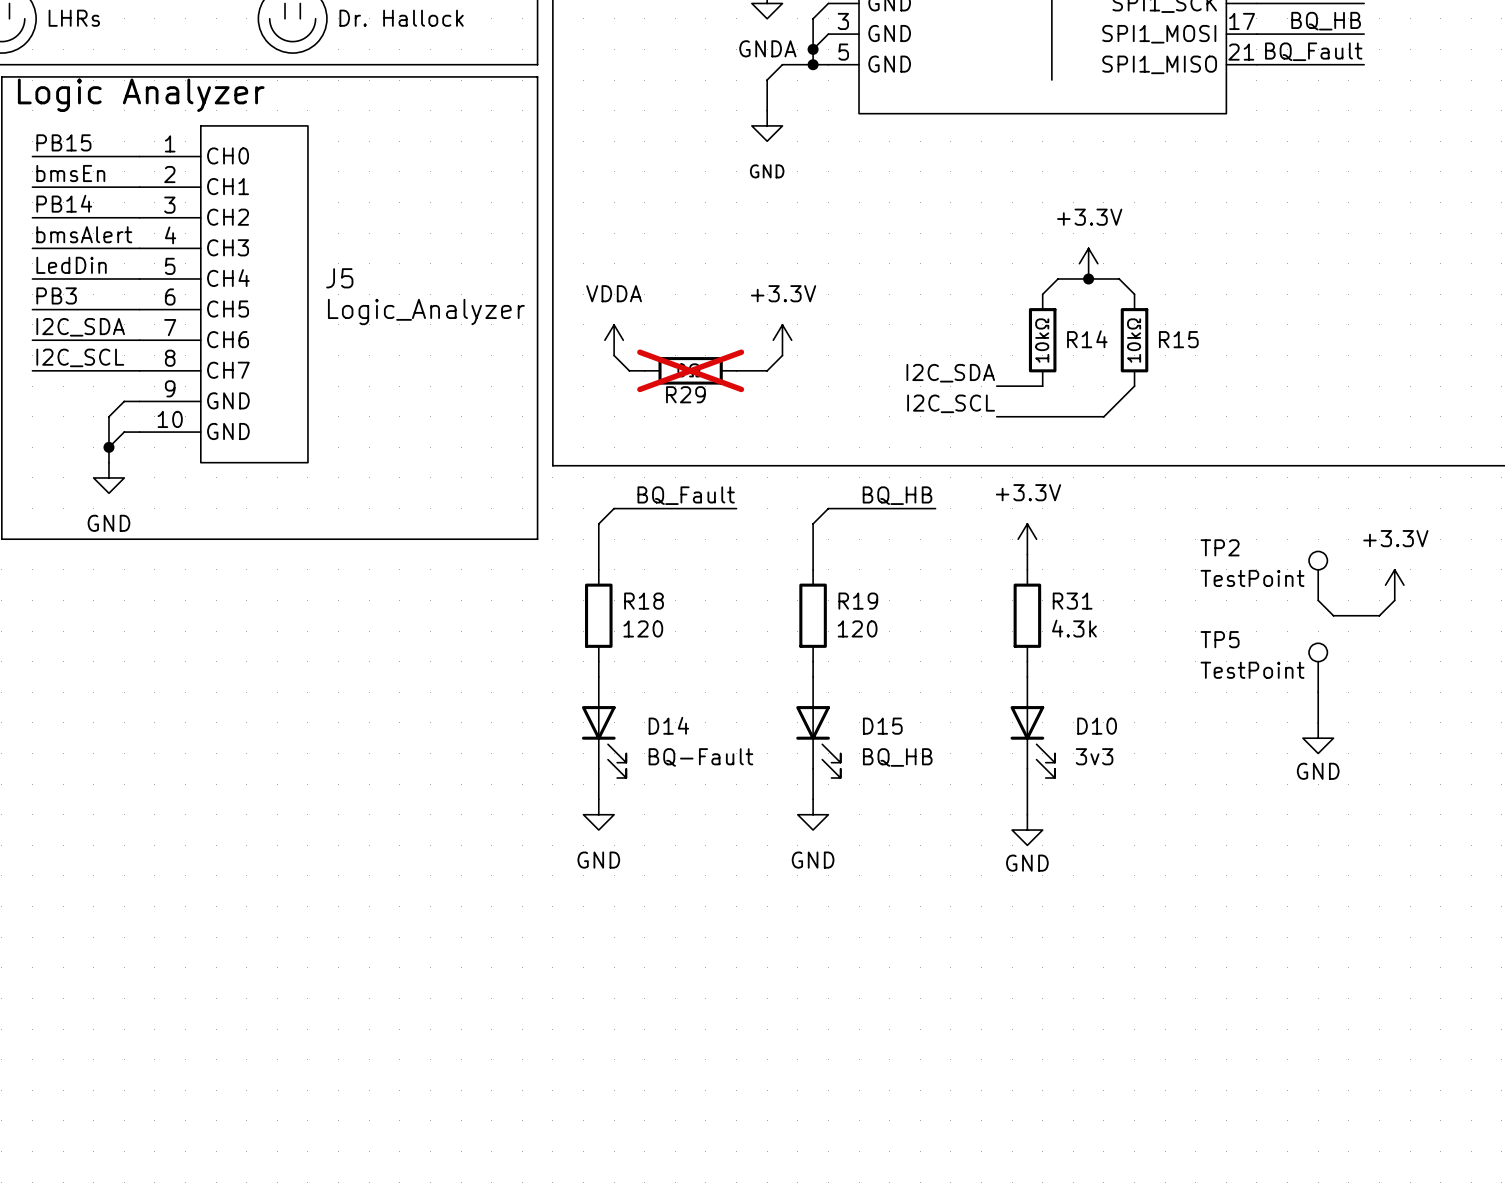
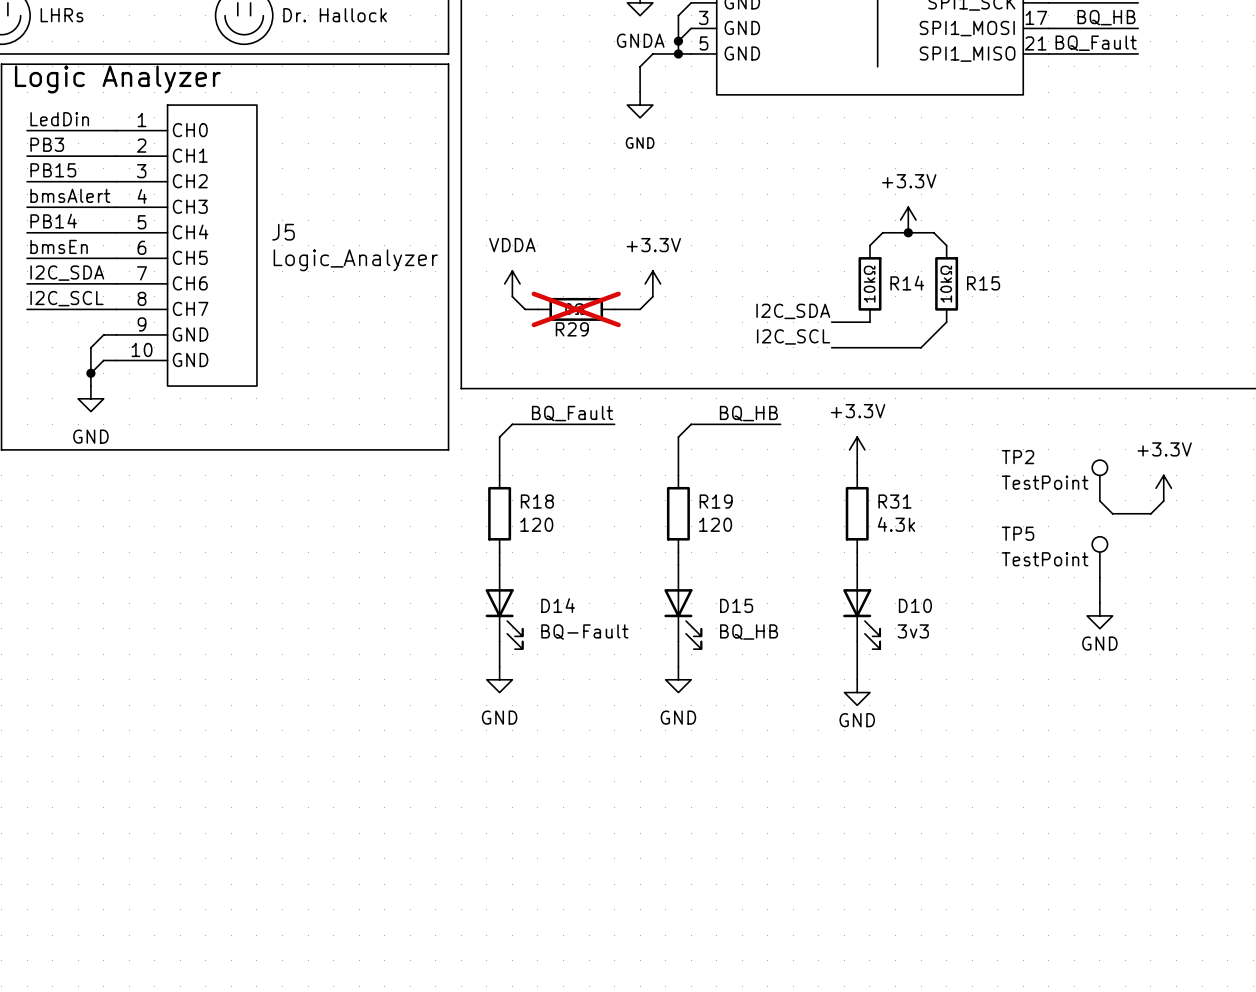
label: PB15 (63, 142) -> LedDin (59, 119)
label: bmsEn (70, 173) -> PB3 (47, 144)
label: PB14 (64, 203) -> PB15 (53, 170)
label: LedDin (71, 265) -> PB14 (53, 221)
label: PB3 (56, 295) -> bmsEn (59, 246)

